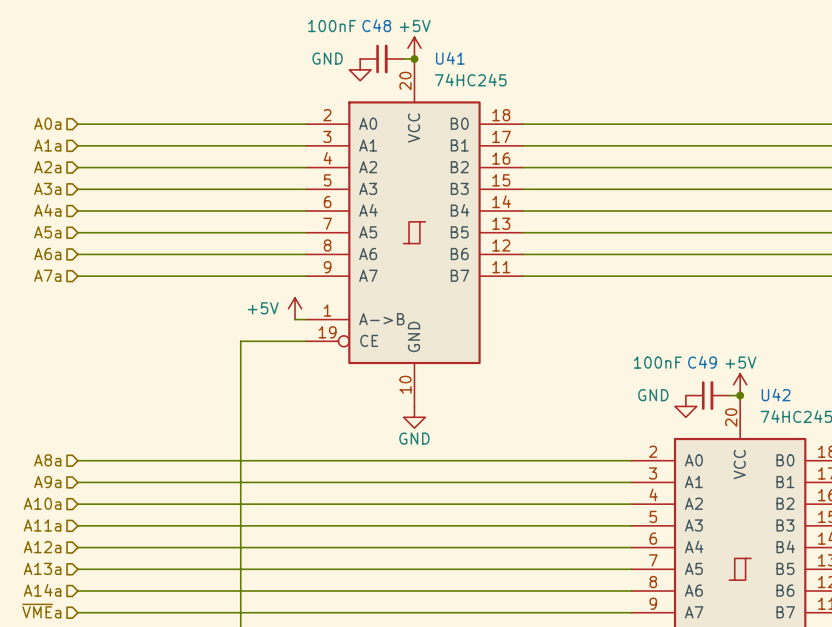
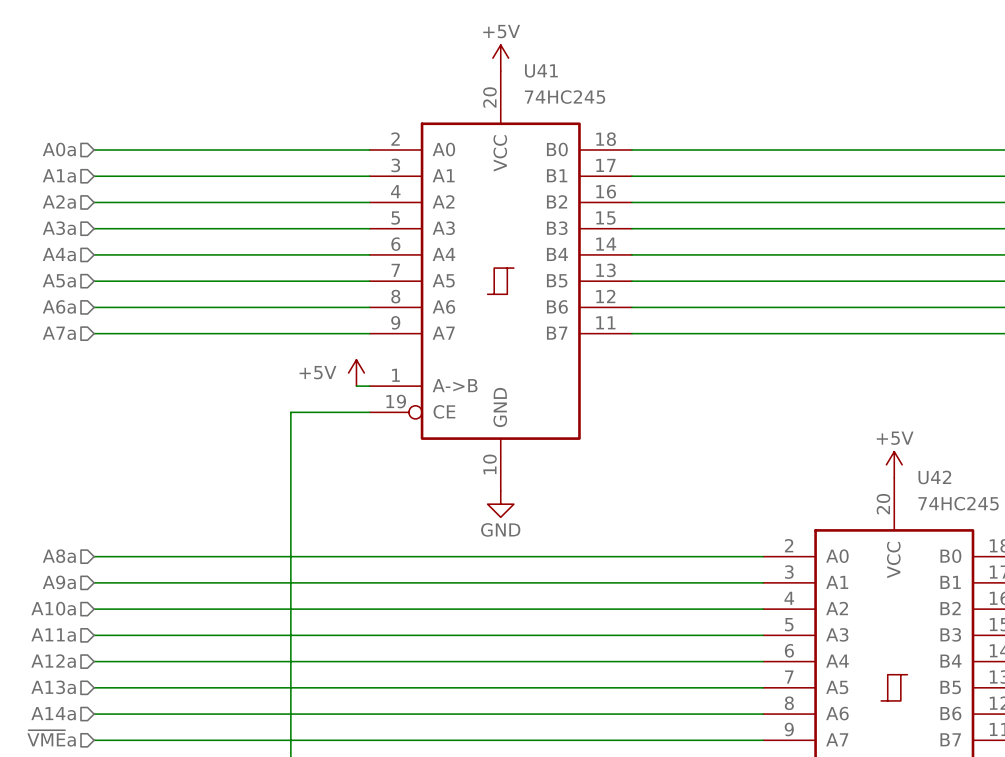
C48: 100nF (381, 59) -> none
wire: (403, 59) (414, 59) -> none
junction: (414, 59) -> none
power symbol: GND (360, 69) -> none
C49: 100nF (707, 395) -> none
wire: (729, 395) (740, 395) -> none
junction: (740, 395) -> none
power symbol: GND (685, 406) -> none

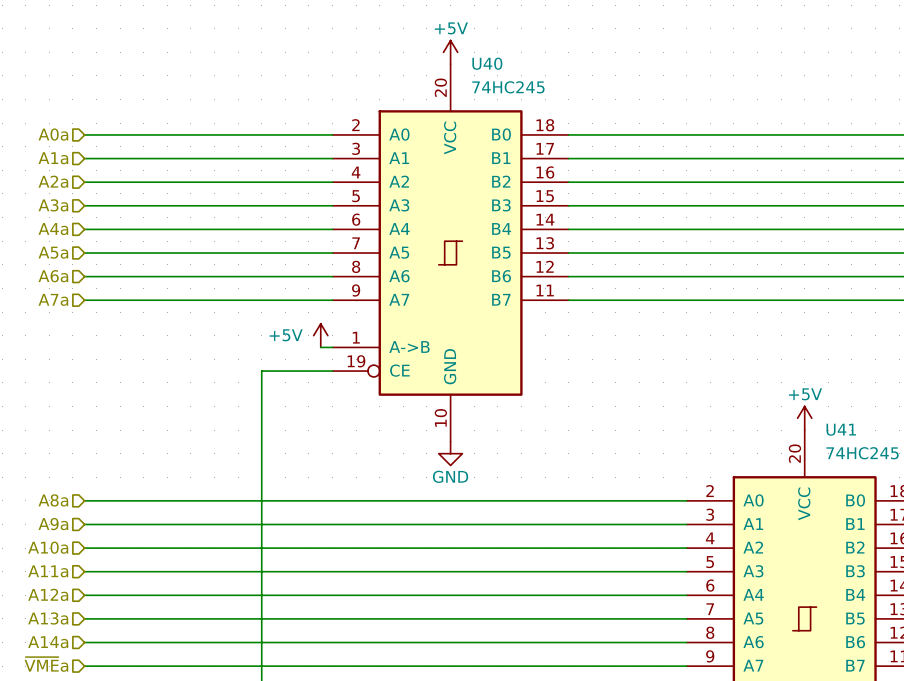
U41 name: U41 (541, 70) -> U40 (487, 63)
U42 name: U42 (934, 477) -> U41 (841, 429)

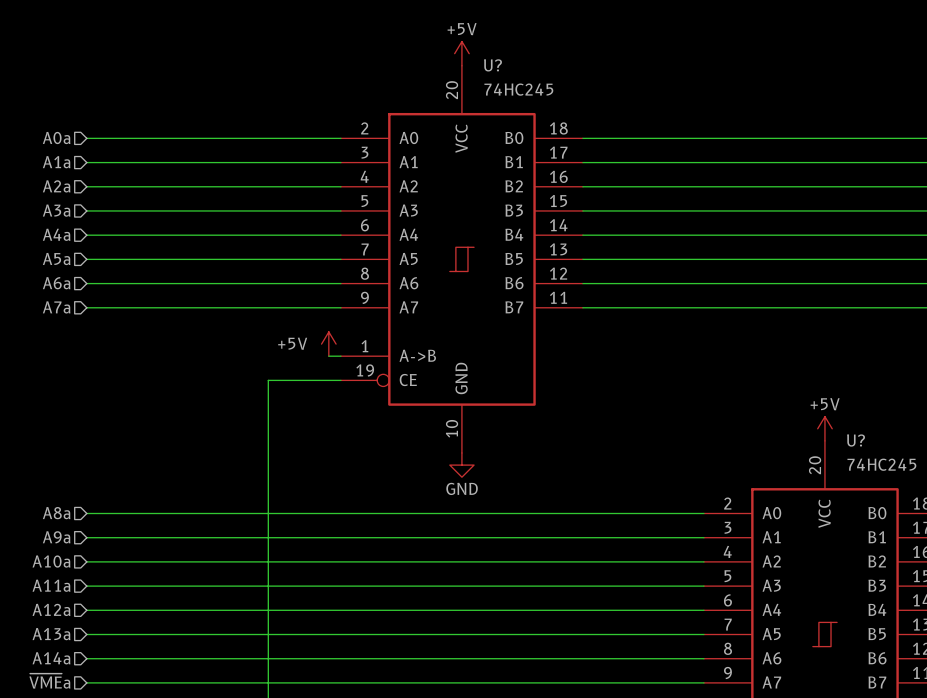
U40 name: U40 (487, 63) -> U? (492, 65)
U41 name: U41 (841, 429) -> U? (856, 440)

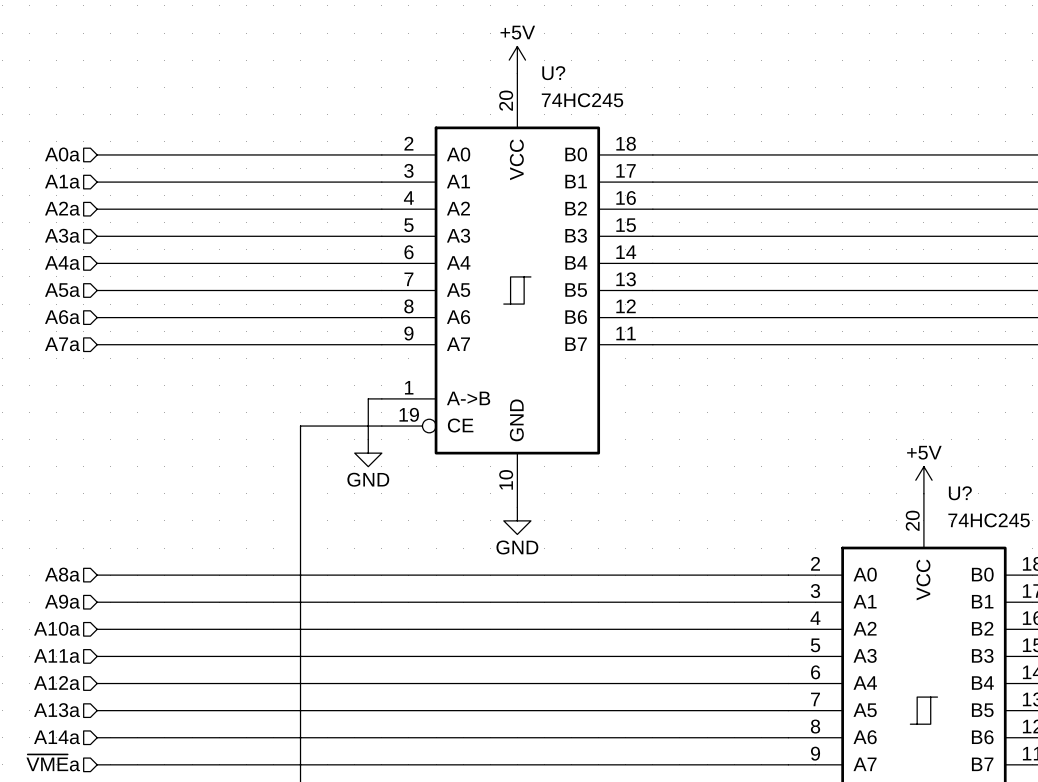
power symbol: +5V (328, 344) -> none
wire: none -> (368, 398) (368, 439)
power symbol: none -> GND (368, 453)

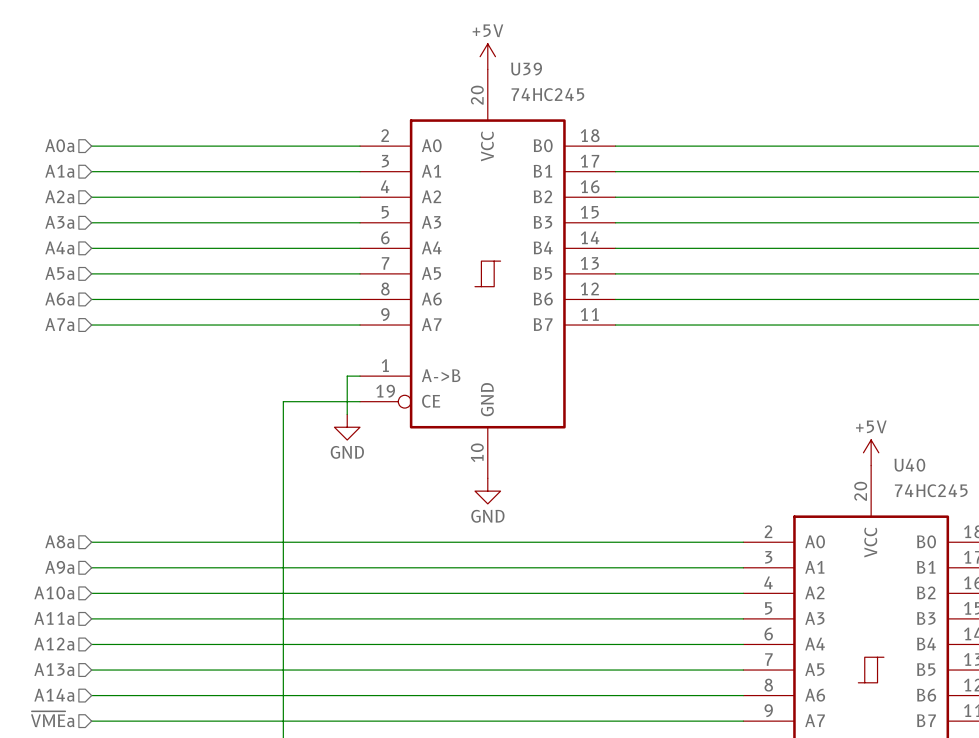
U? name: U? (553, 73) -> U39 (526, 69)
U? name: U? (960, 493) -> U40 (909, 465)

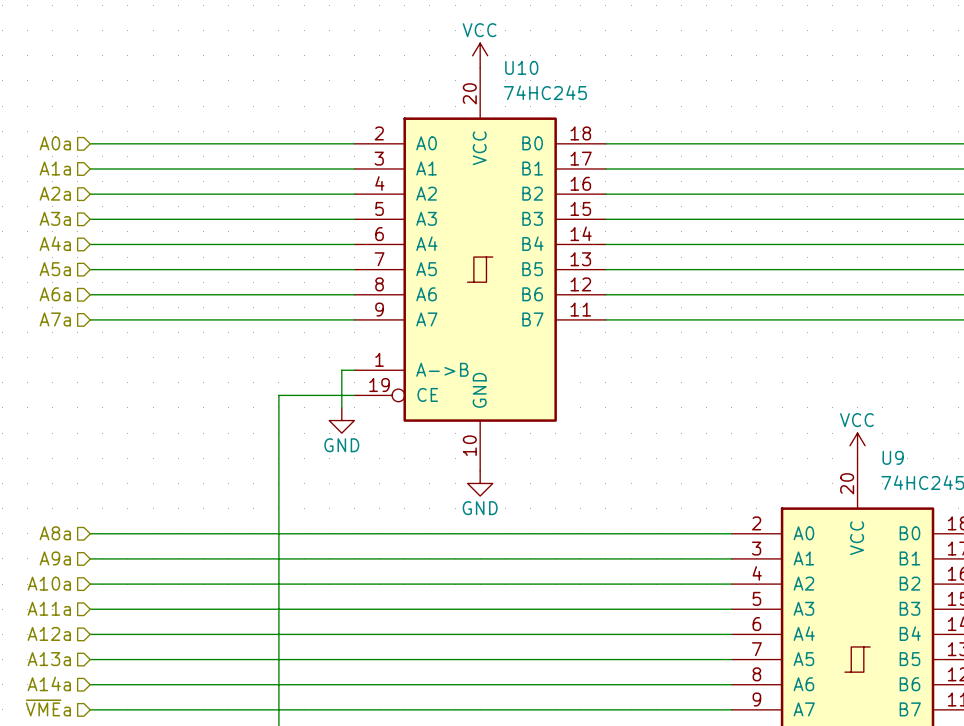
power symbol: +5V (487, 56) -> VCC (480, 55)
U39 name: U39 (526, 69) -> U10 (521, 67)
power symbol: +5V (871, 452) -> VCC (857, 445)
U40 name: U40 (909, 465) -> U9 (893, 457)

